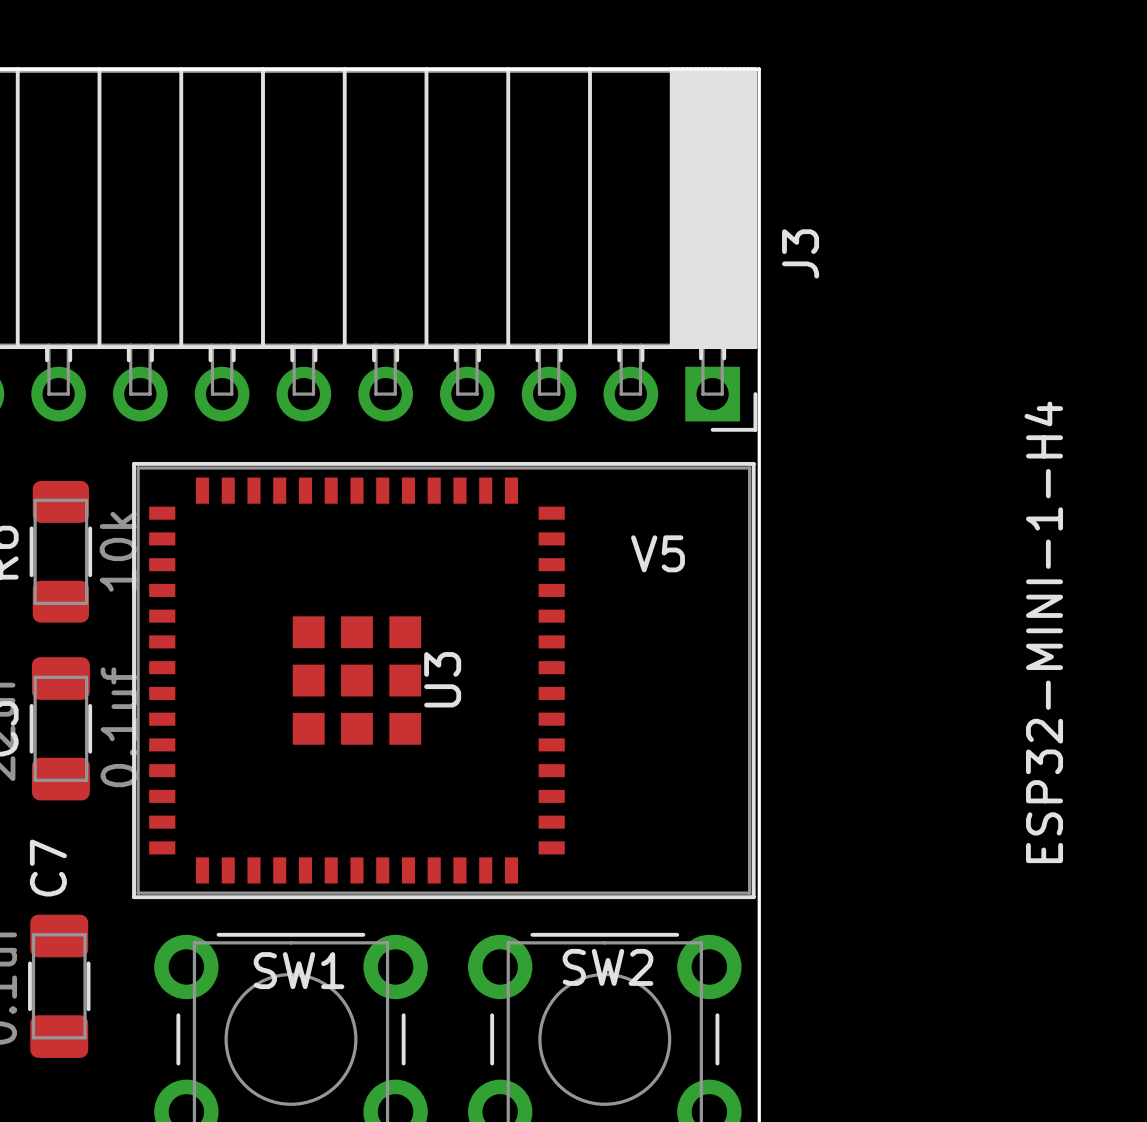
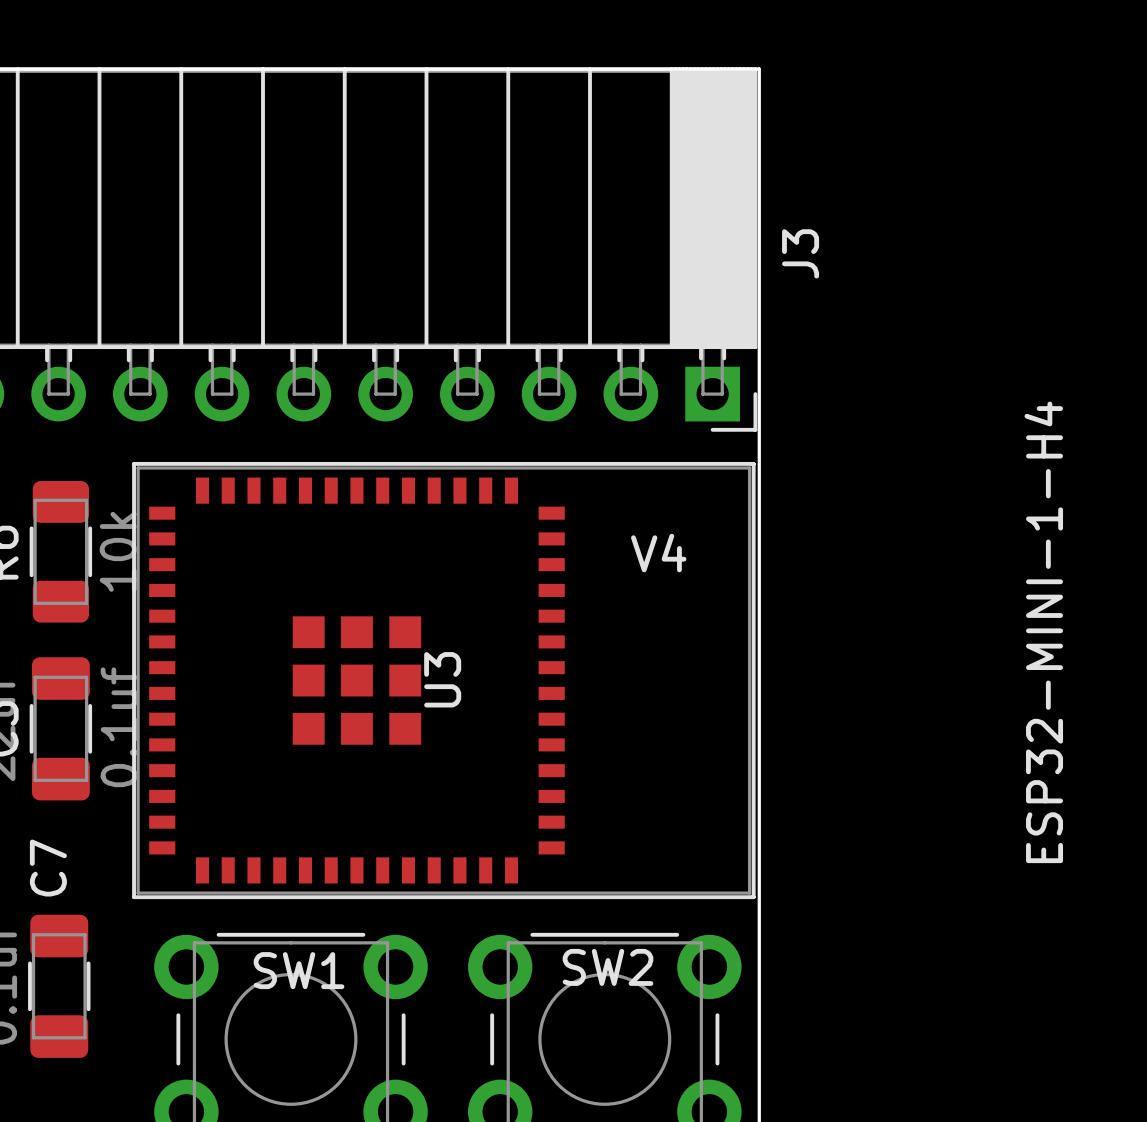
text: V5 (657, 553) -> V4 (658, 553)

